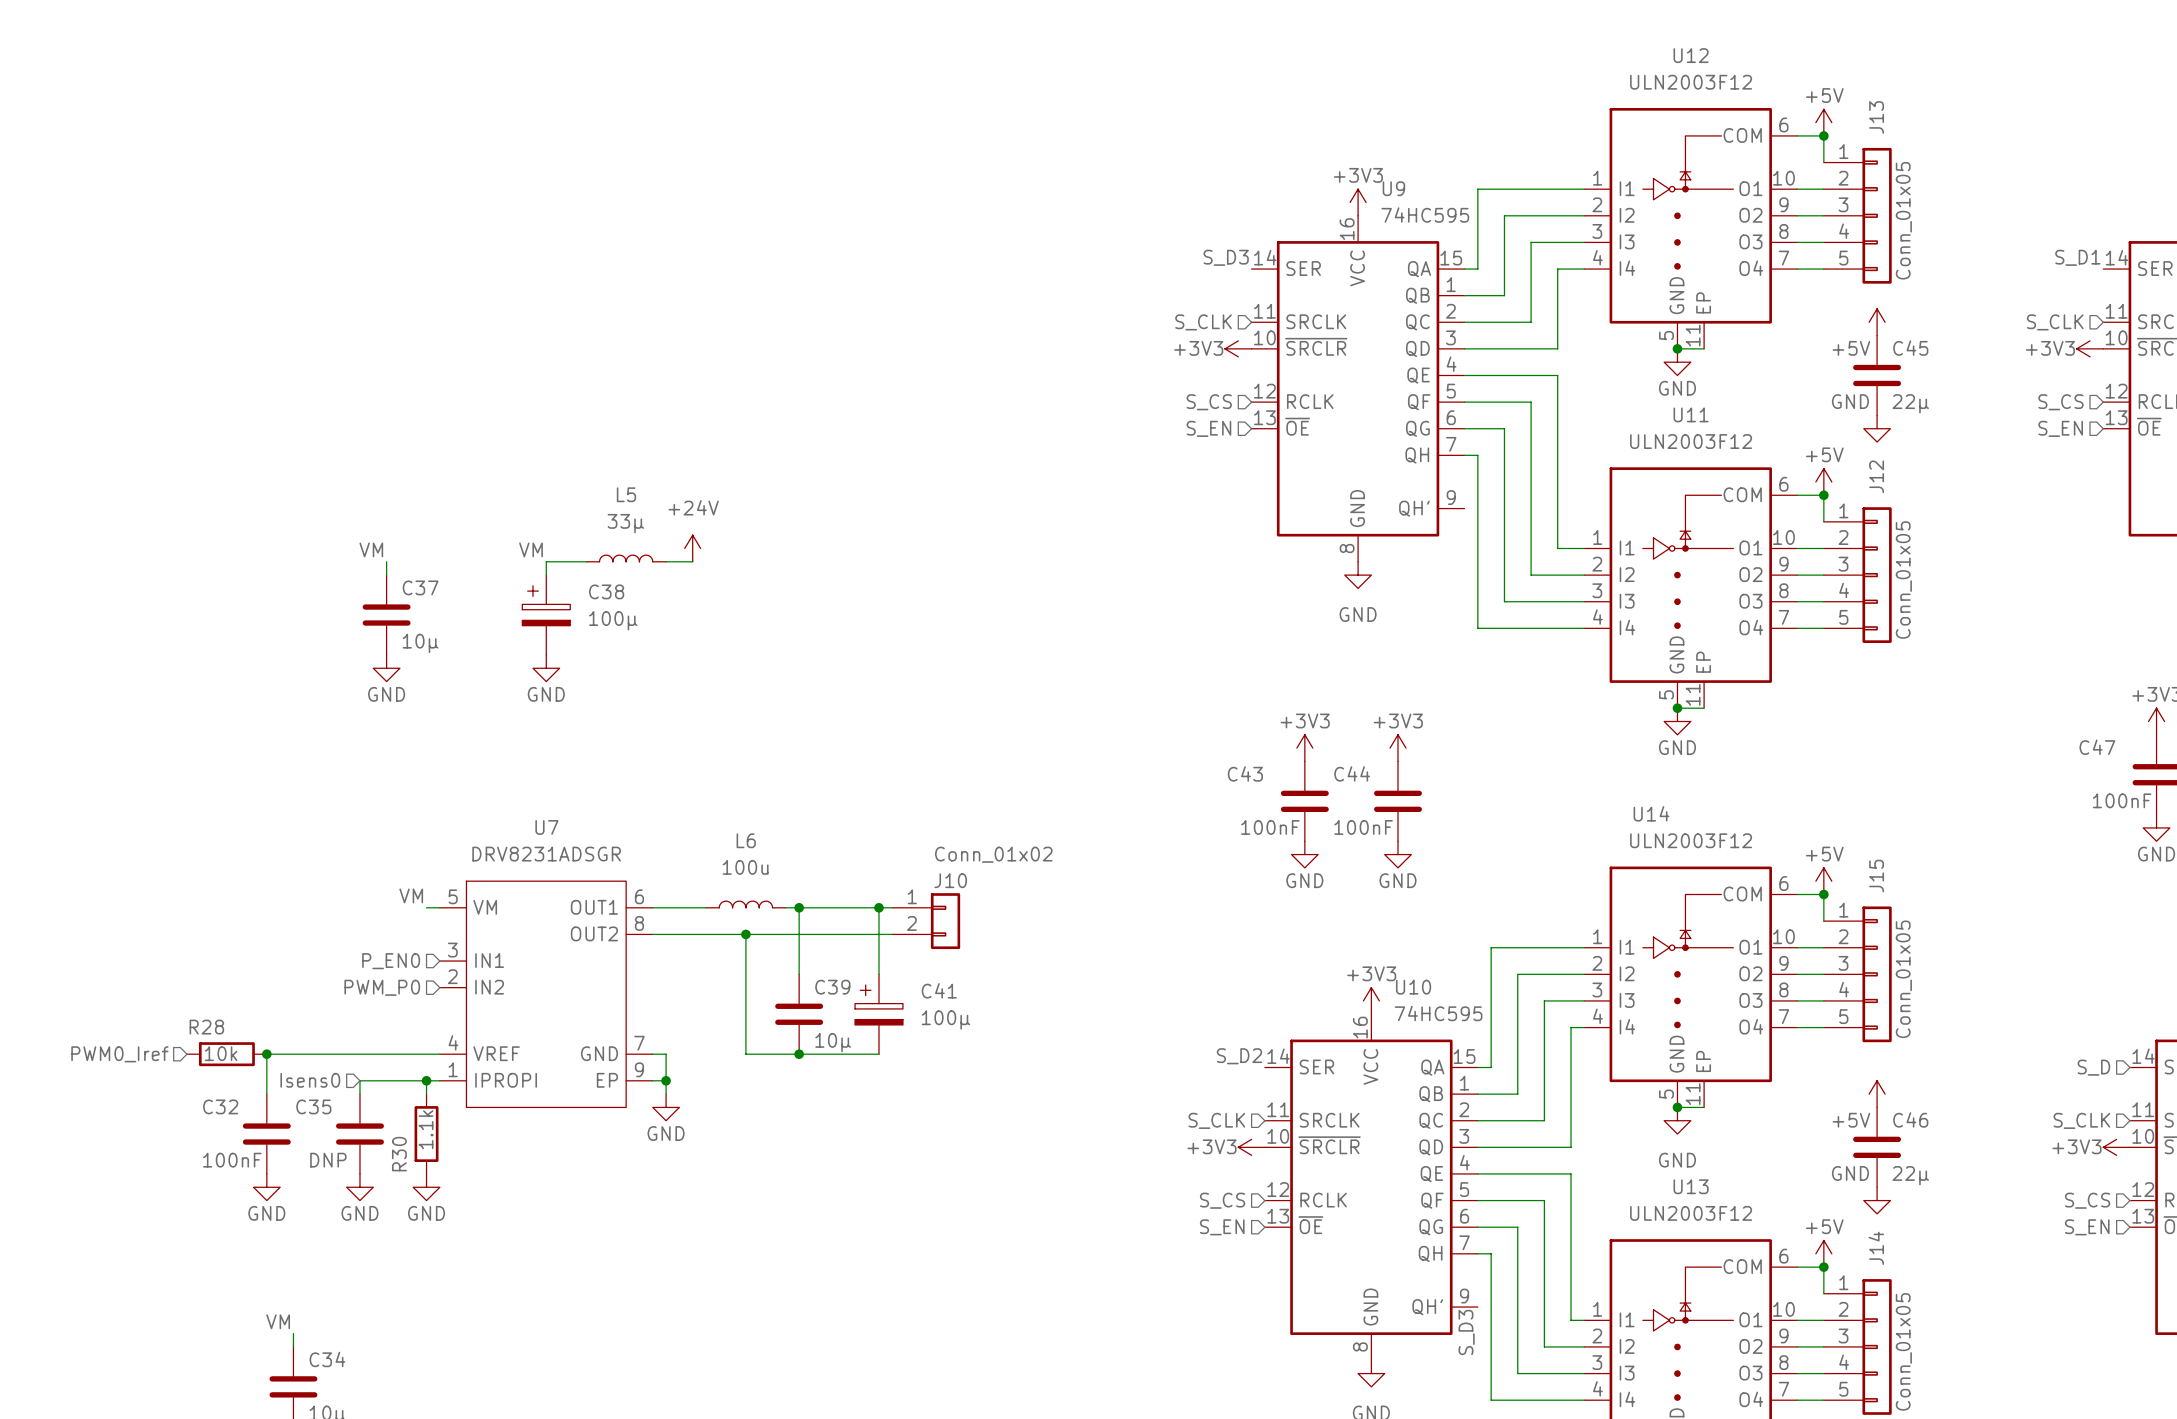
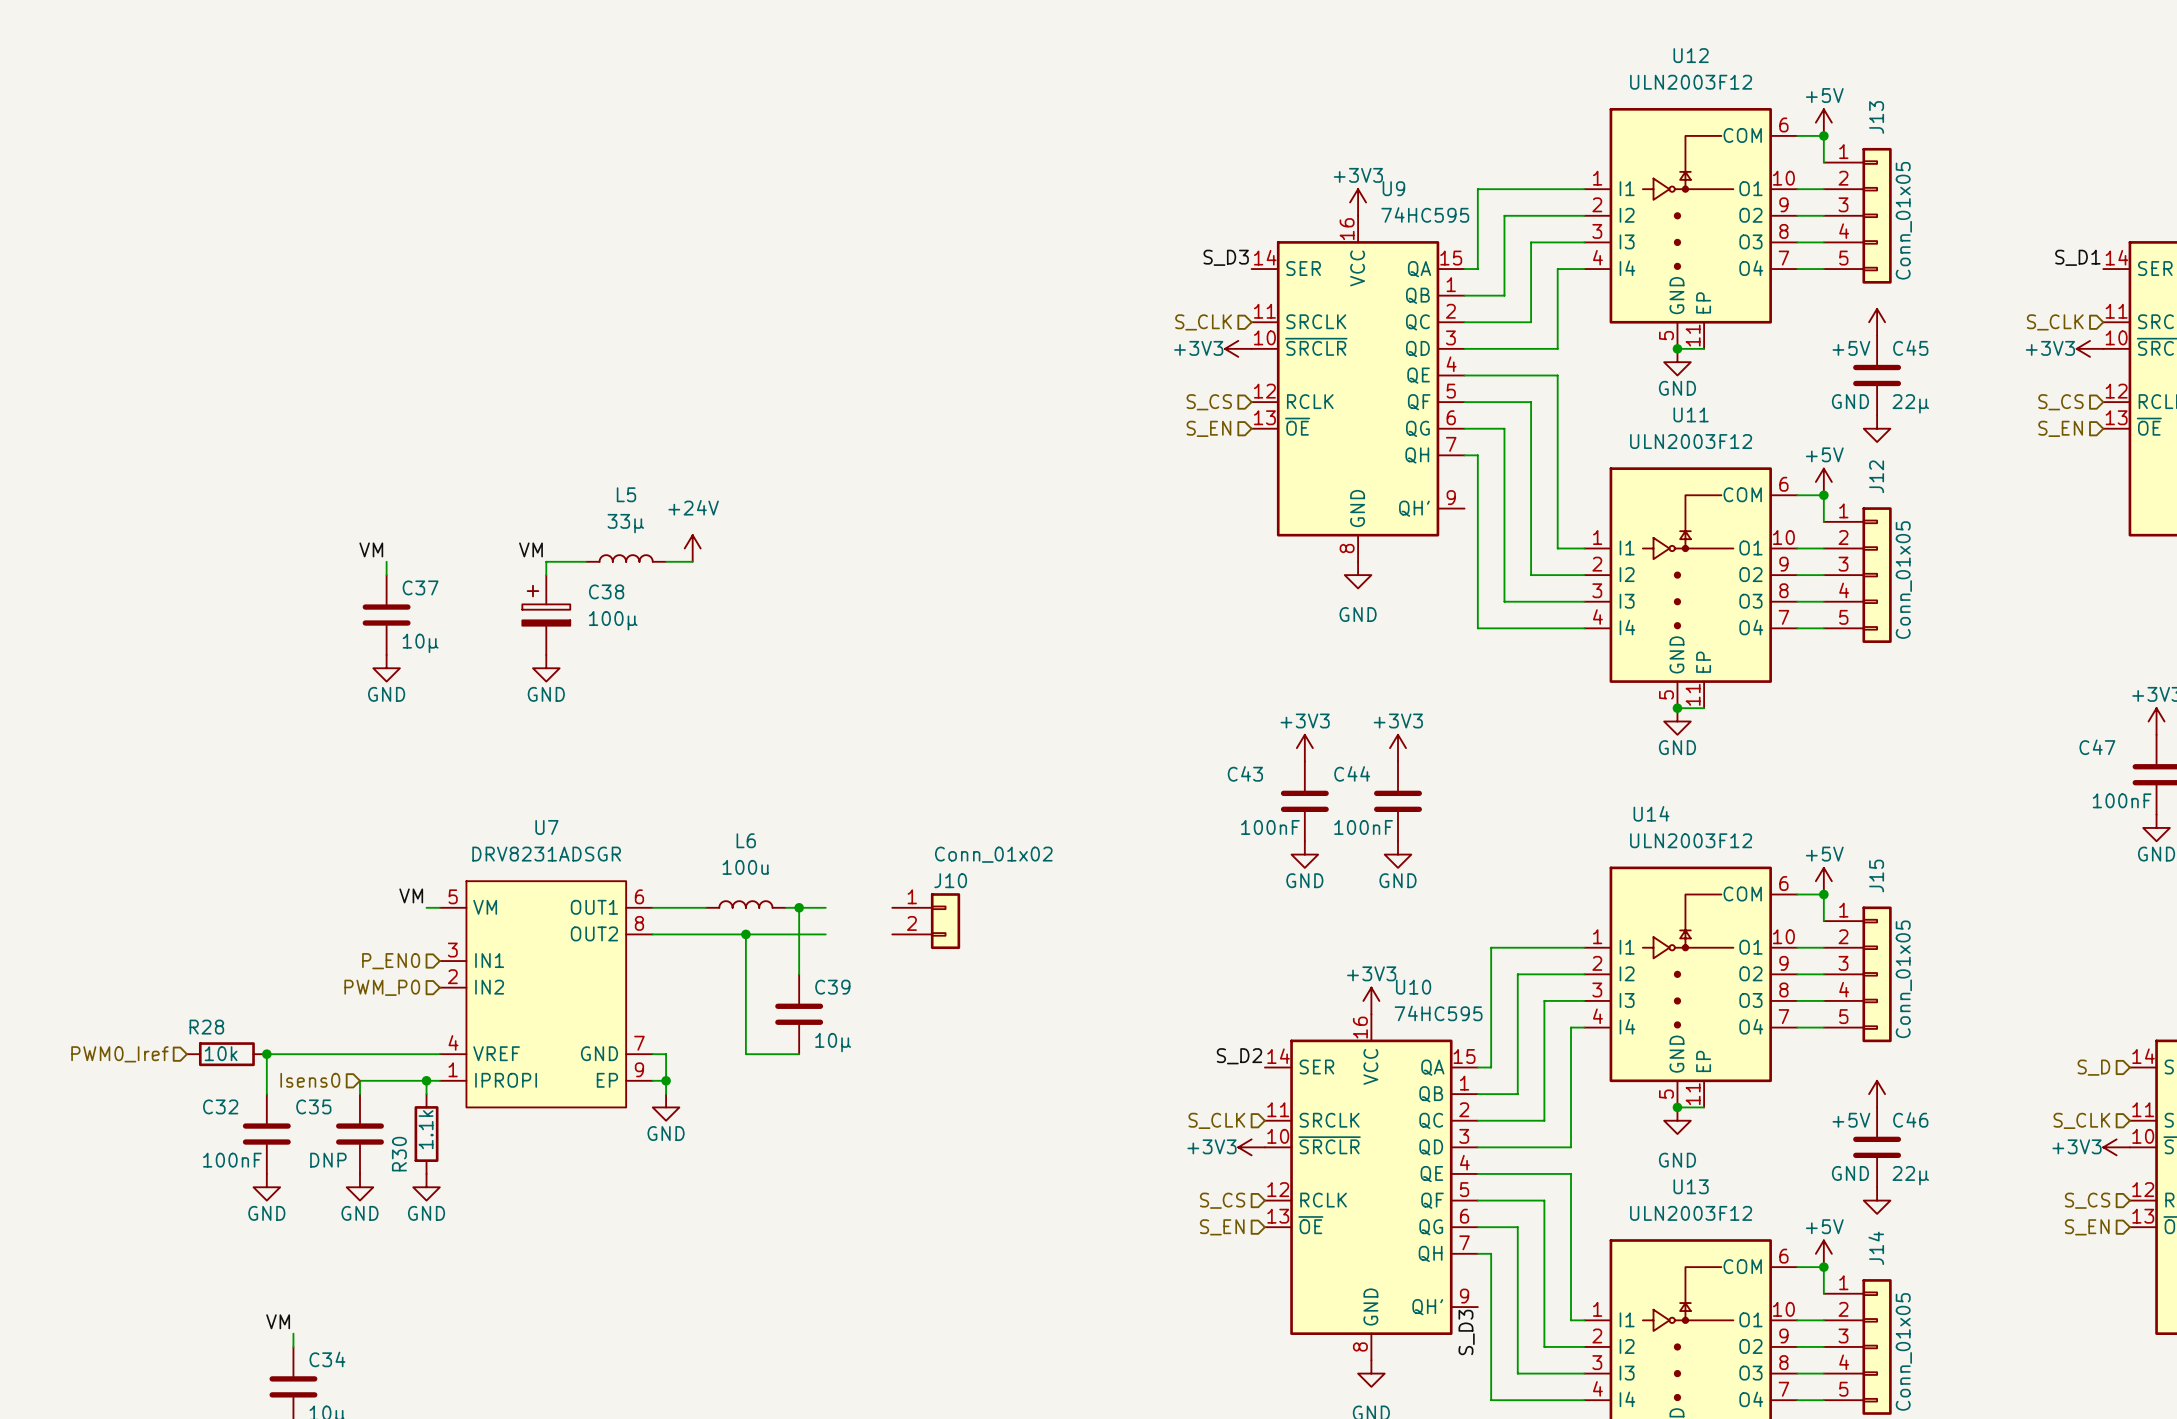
wire: (825, 907) (892, 907) -> none
wire: (878, 907) (878, 974) -> none
junction: (878, 907) -> none
wire: (825, 934) (892, 934) -> none
C41: 100µ (878, 1014) -> none
wire: (799, 1054) (878, 1054) -> none
junction: (799, 1054) -> none

